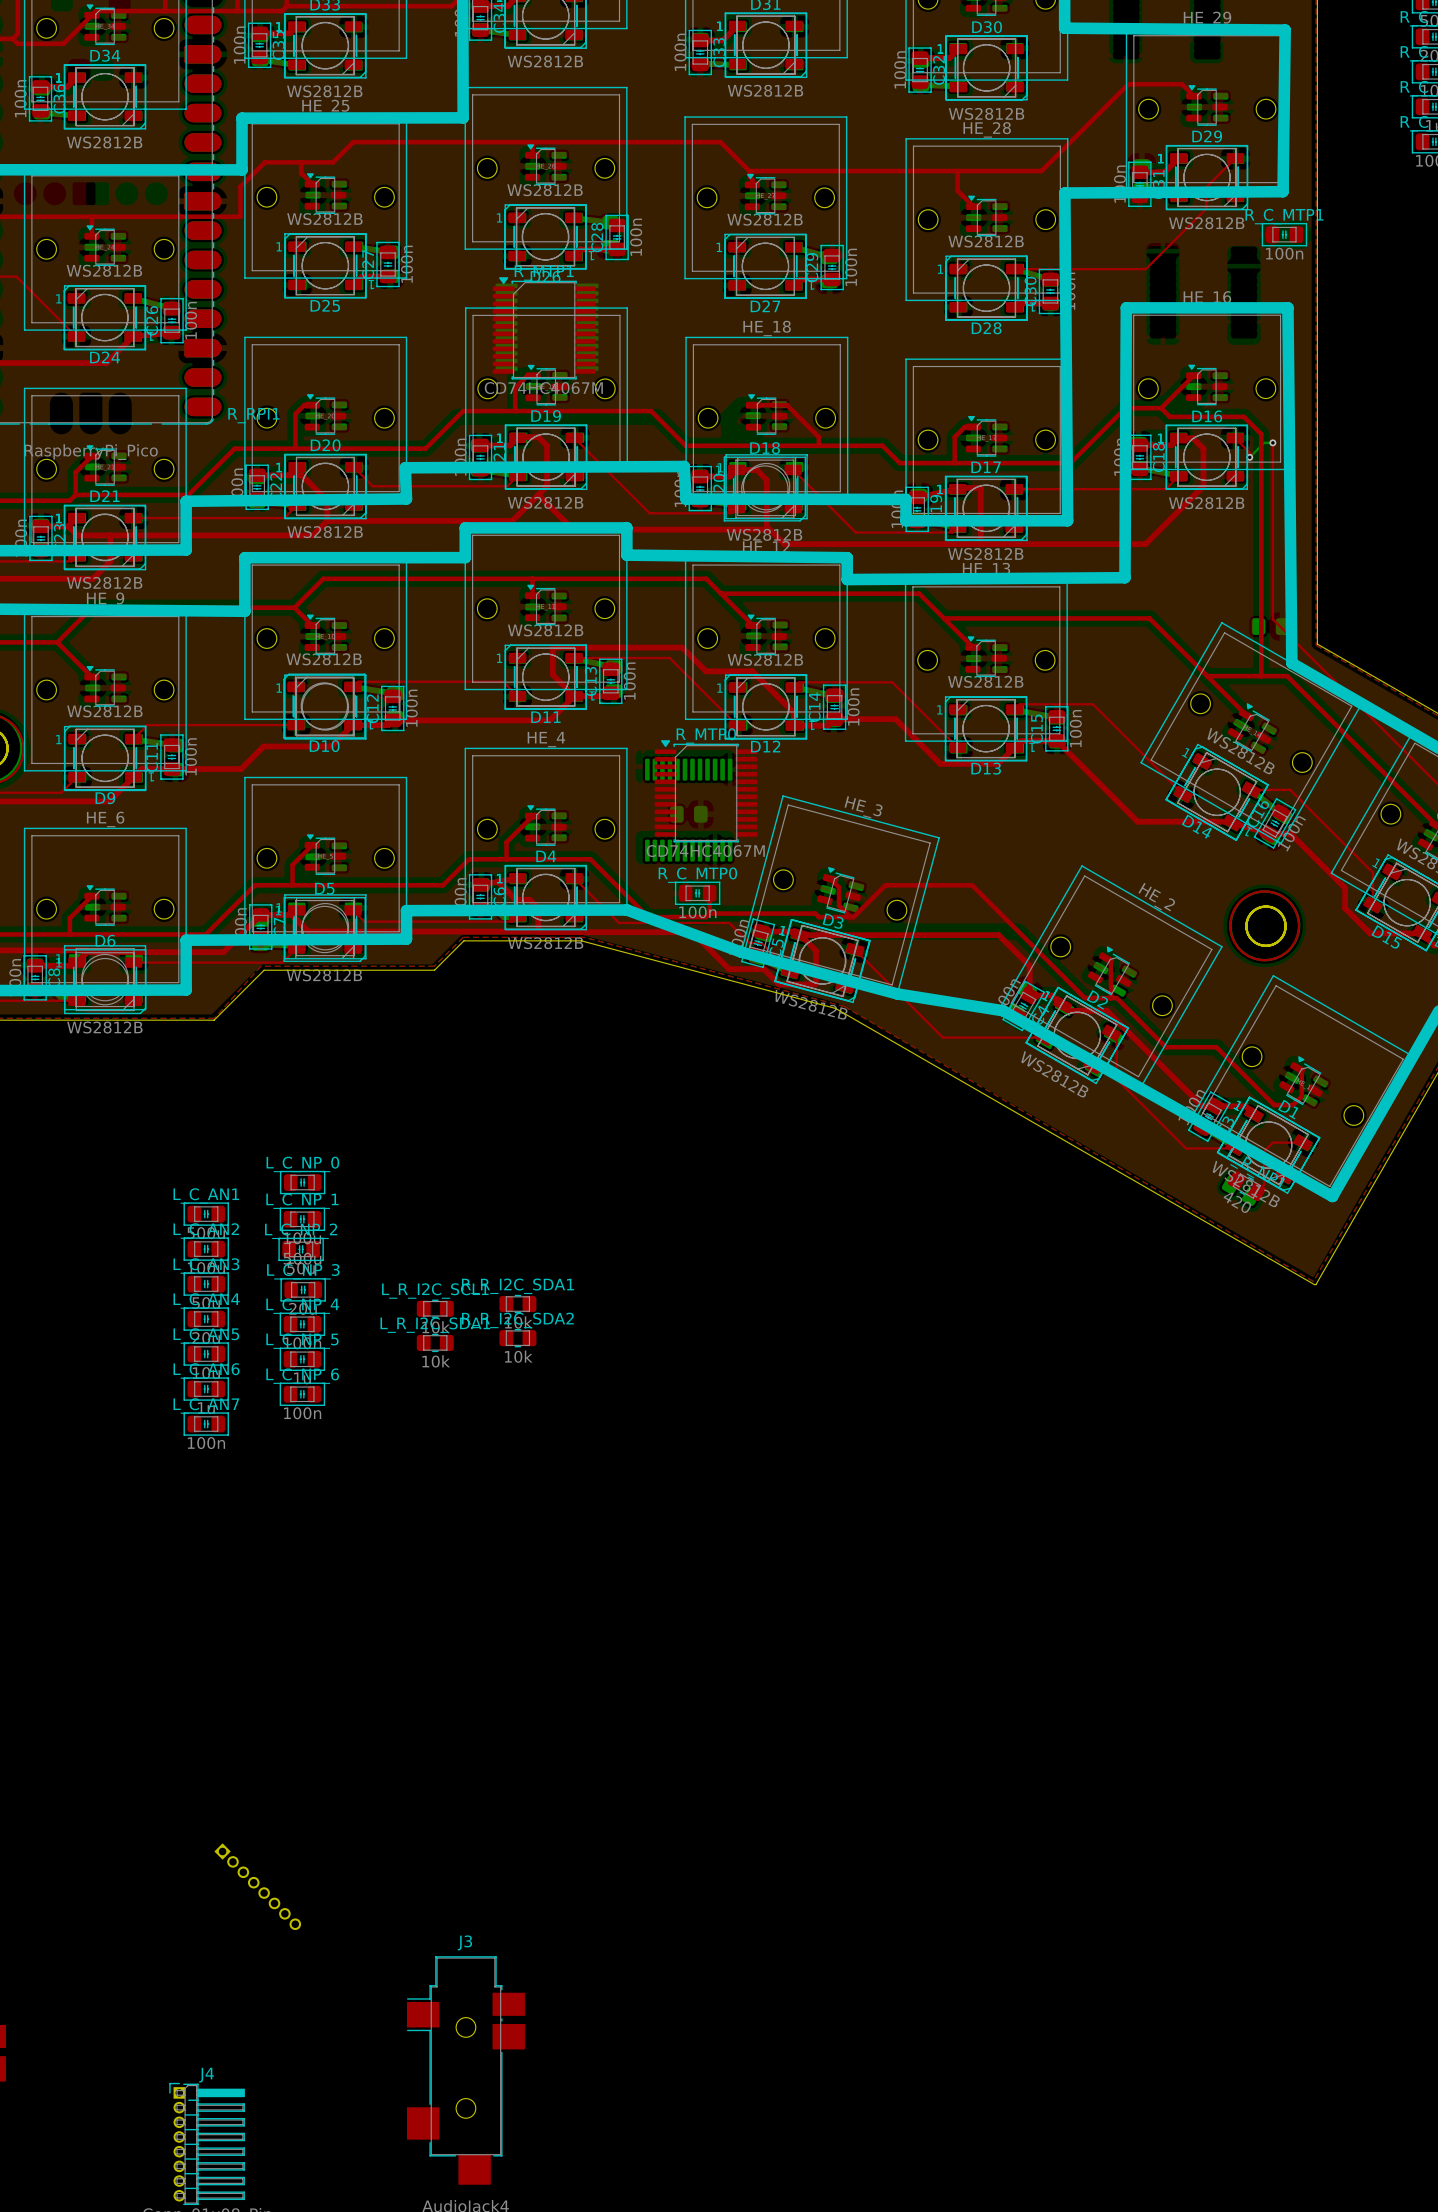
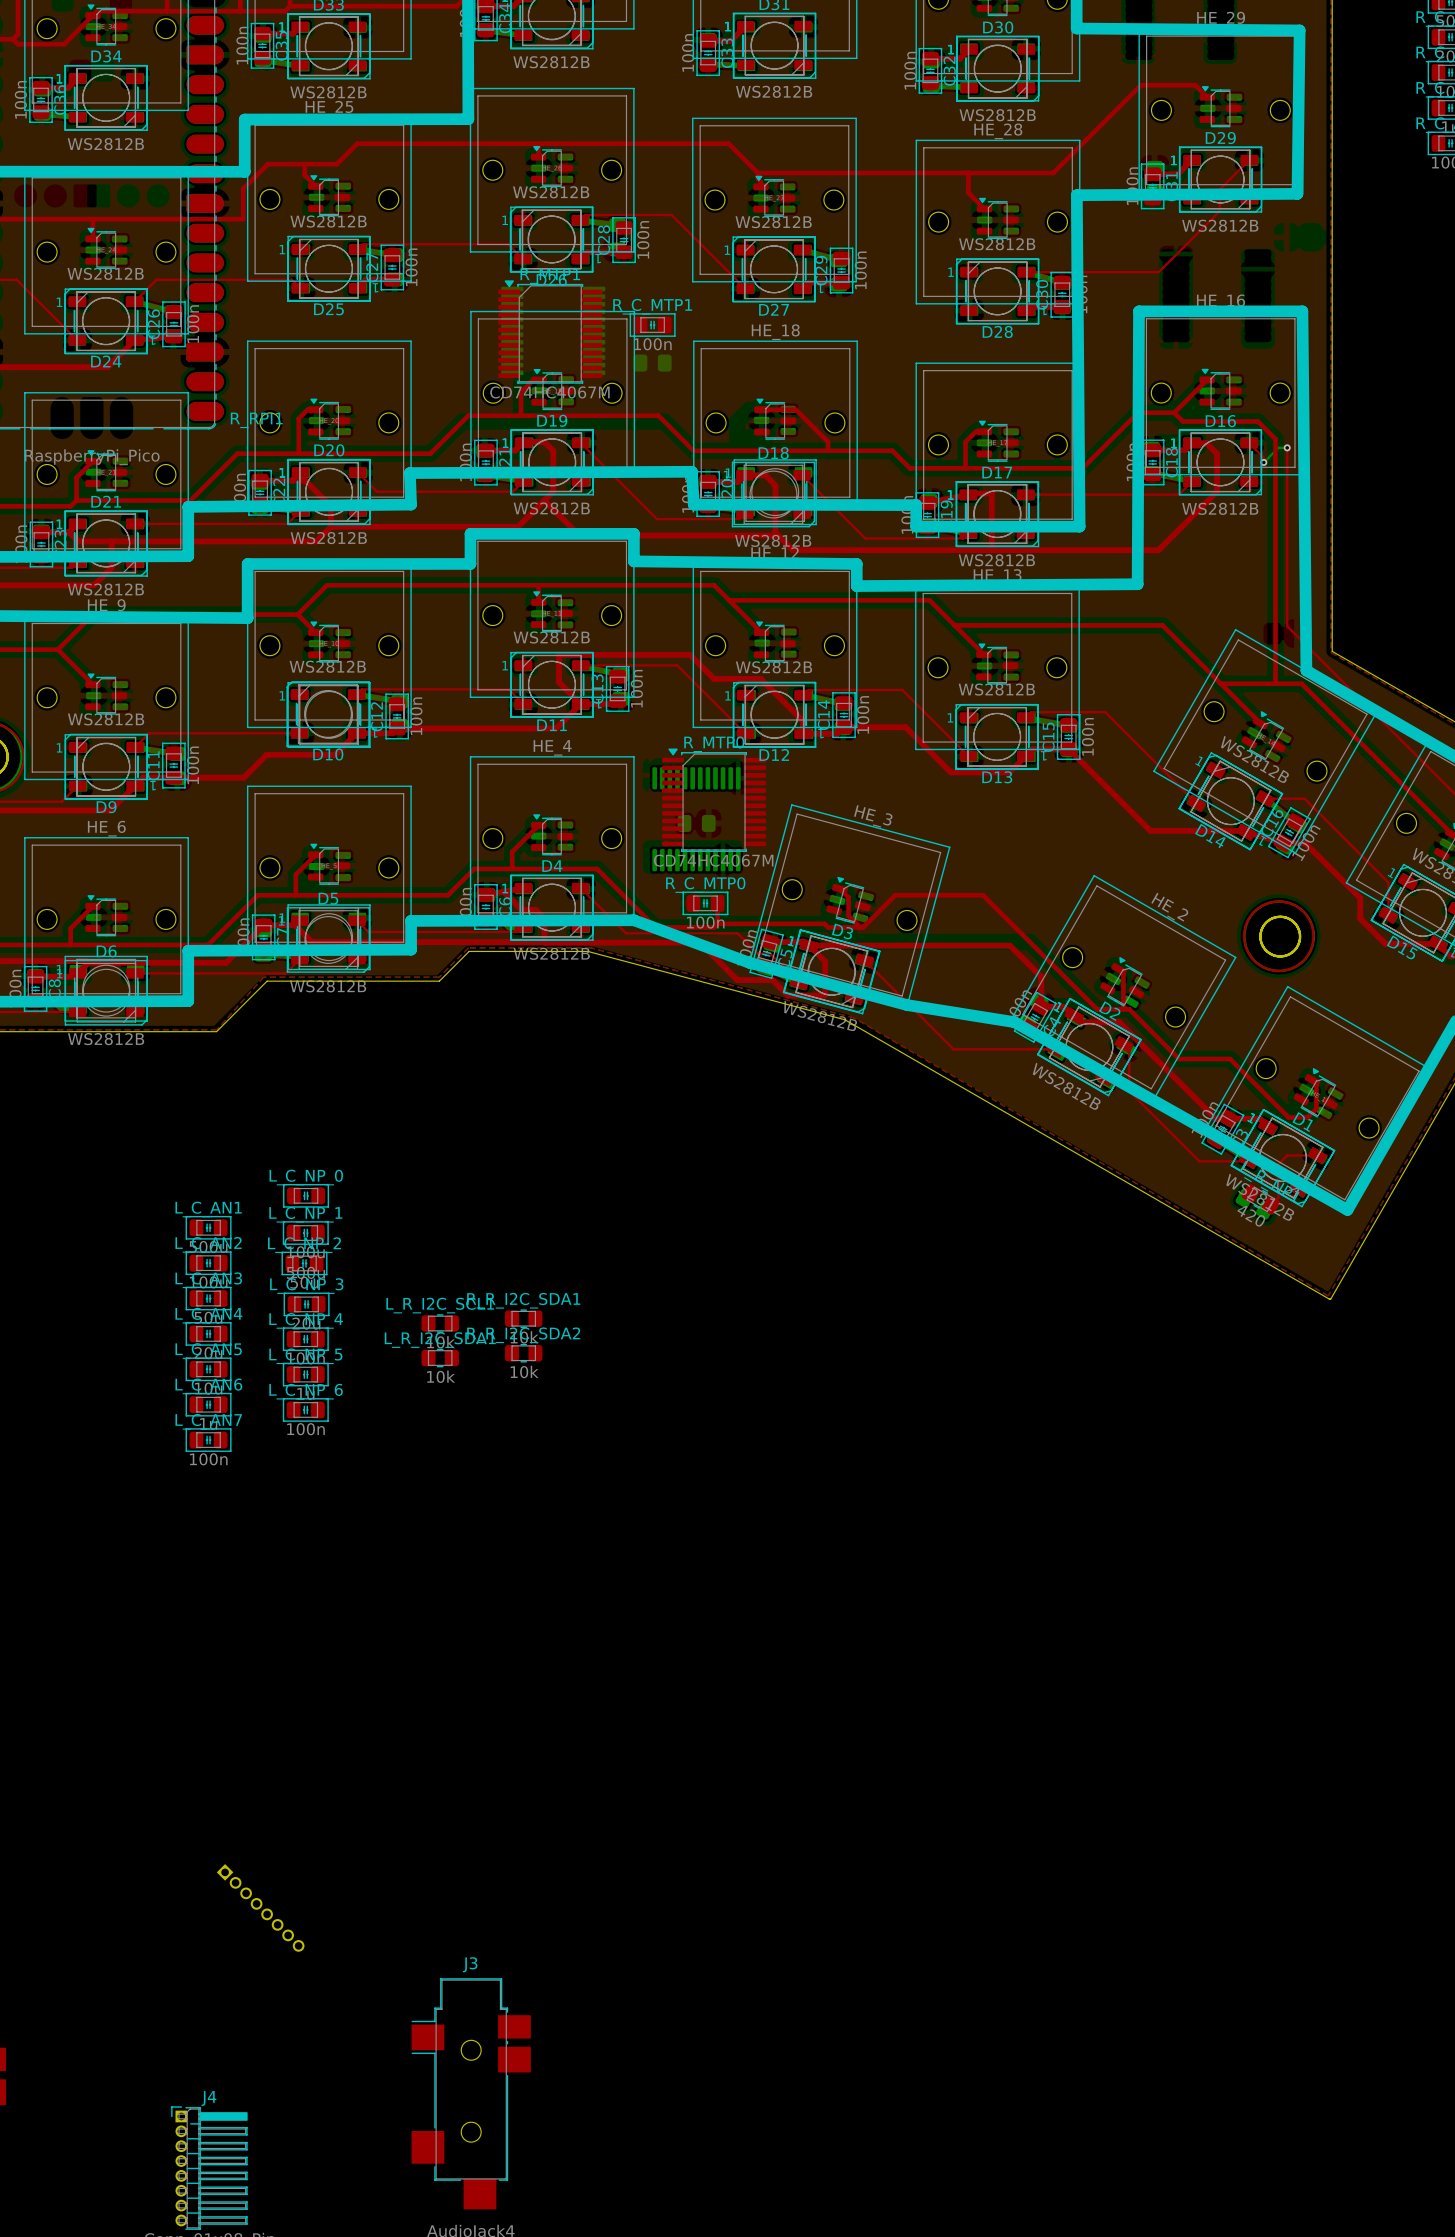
top track: none -> (580, 220) (585, 214) (671, 214) (745, 288)
R_C_MTP1 position: (1284, 234) -> (652, 325)
top track: none -> (357, 249) (362, 244) (508, 244) (522, 258)
top track: none -> (300, 288) (291, 279) (156, 279) (134, 301)
part: none -> (652, 363)
part: (1270, 626) -> none

